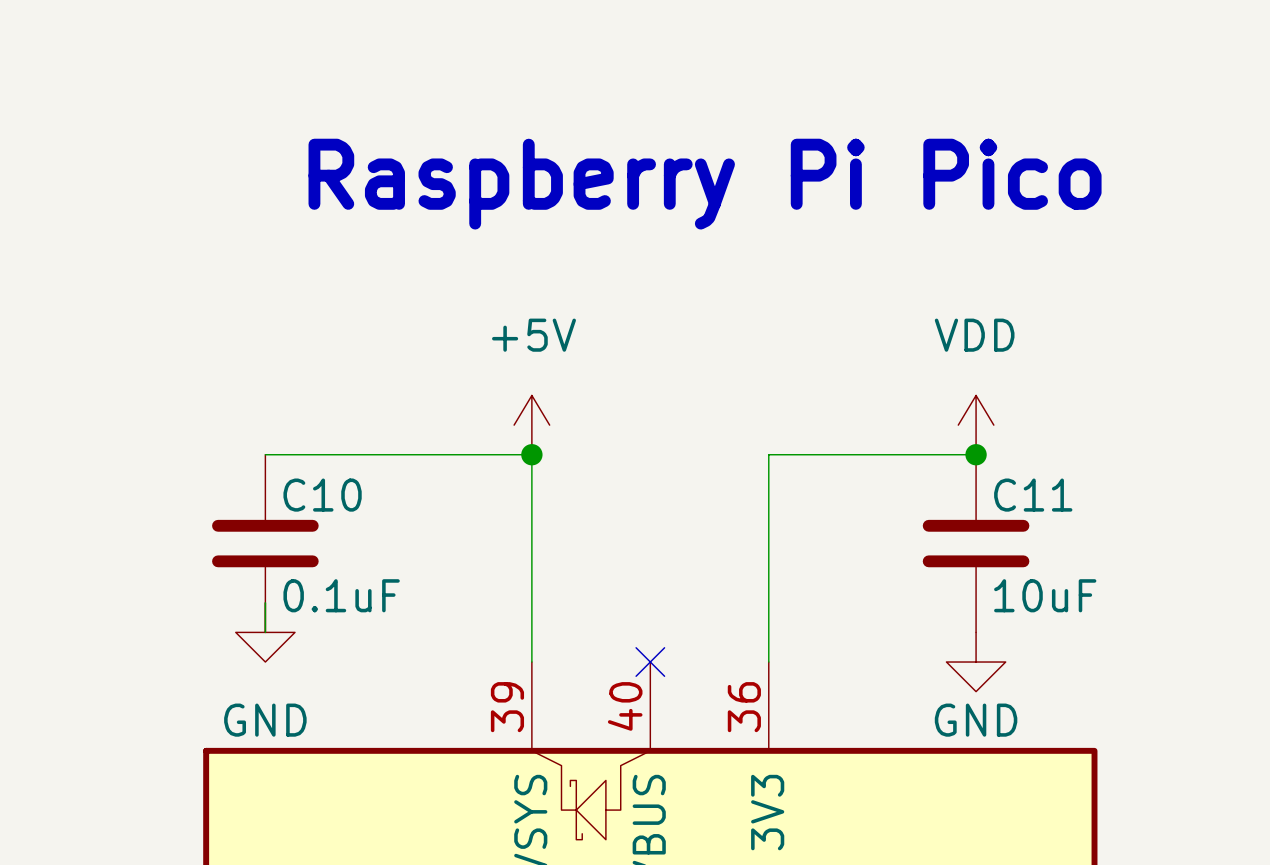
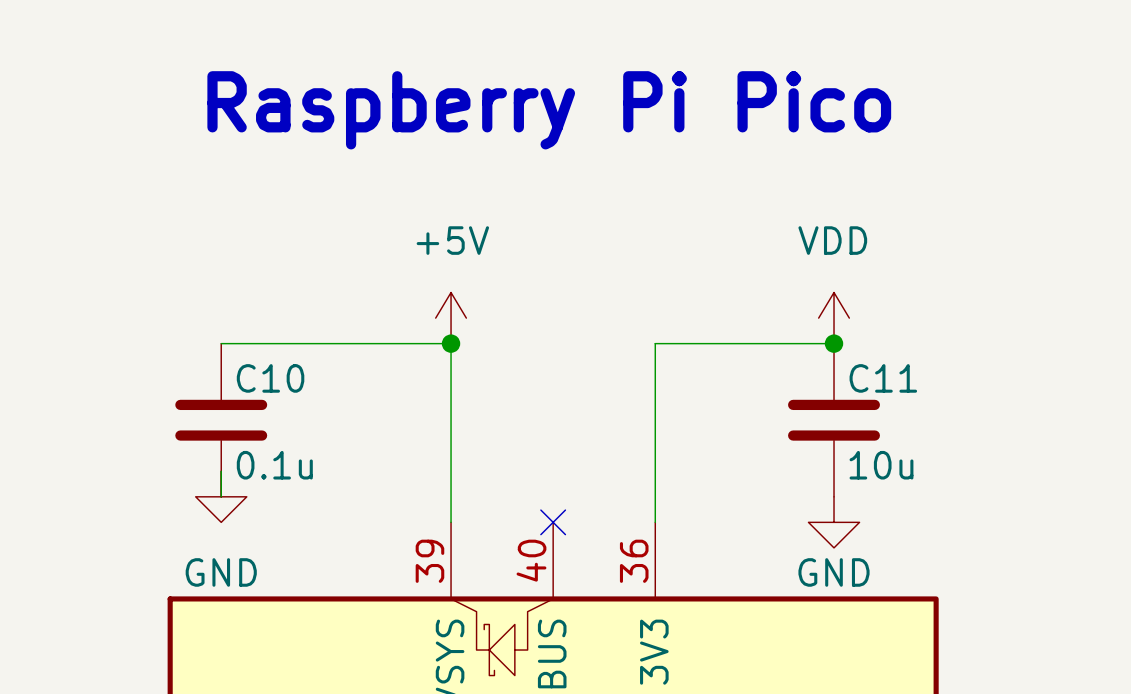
text position: Raspberry Pi Pico (705, 184) -> Raspberry Pi Pico (549, 110)
C10 value: 0.1uF (341, 595) -> 0.1u (274, 465)
C11 value: 10uF (1045, 595) -> 10u (881, 465)

